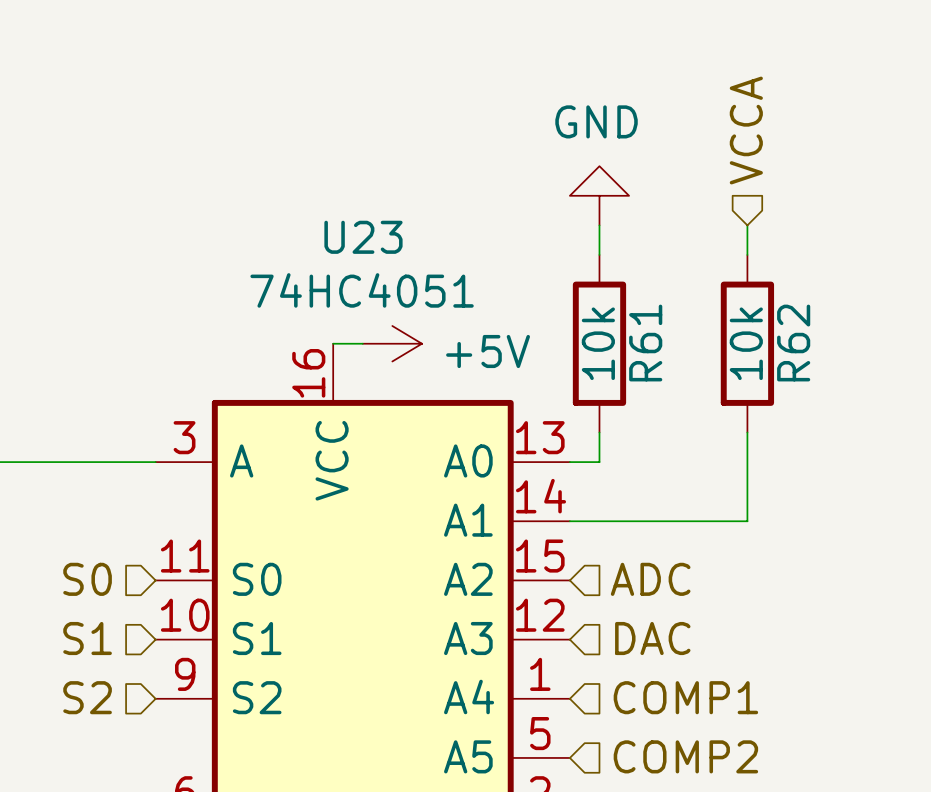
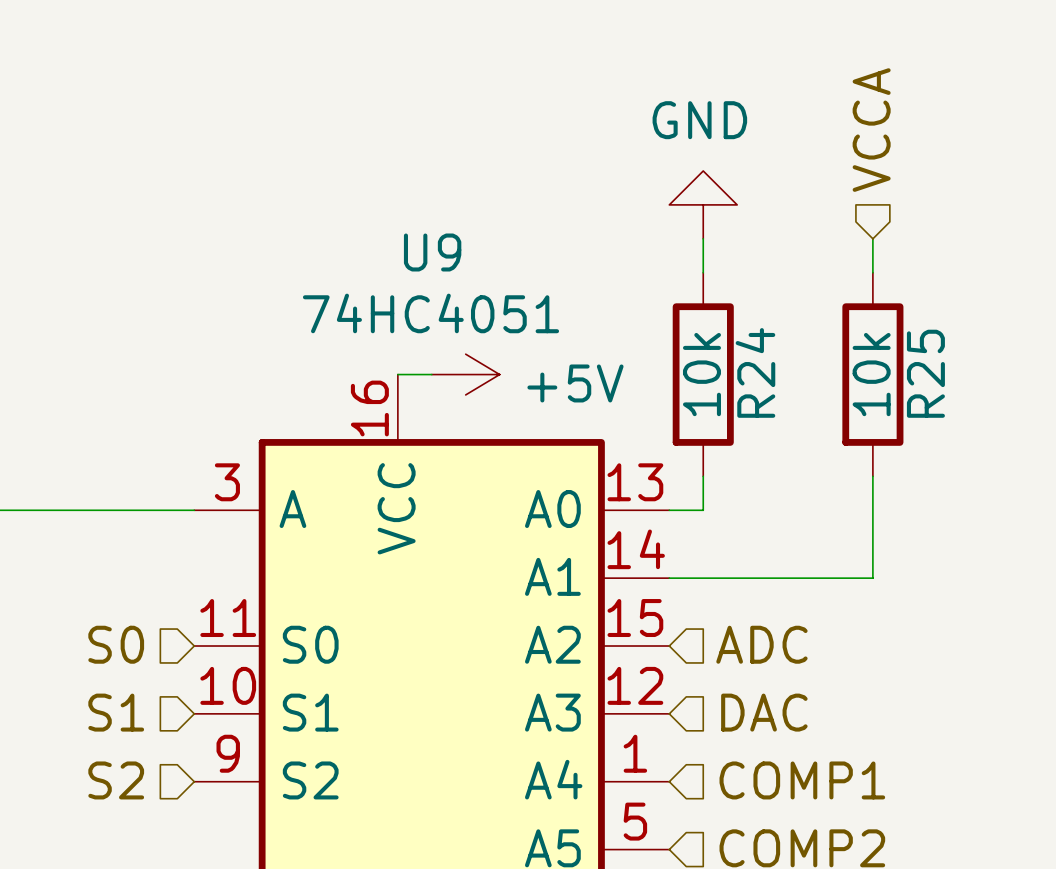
U23 name: U23 (363, 237) -> U9 (432, 252)
R61 name: R61 (645, 343) -> R24 (755, 372)
R62 name: R62 (793, 343) -> R25 (925, 373)

